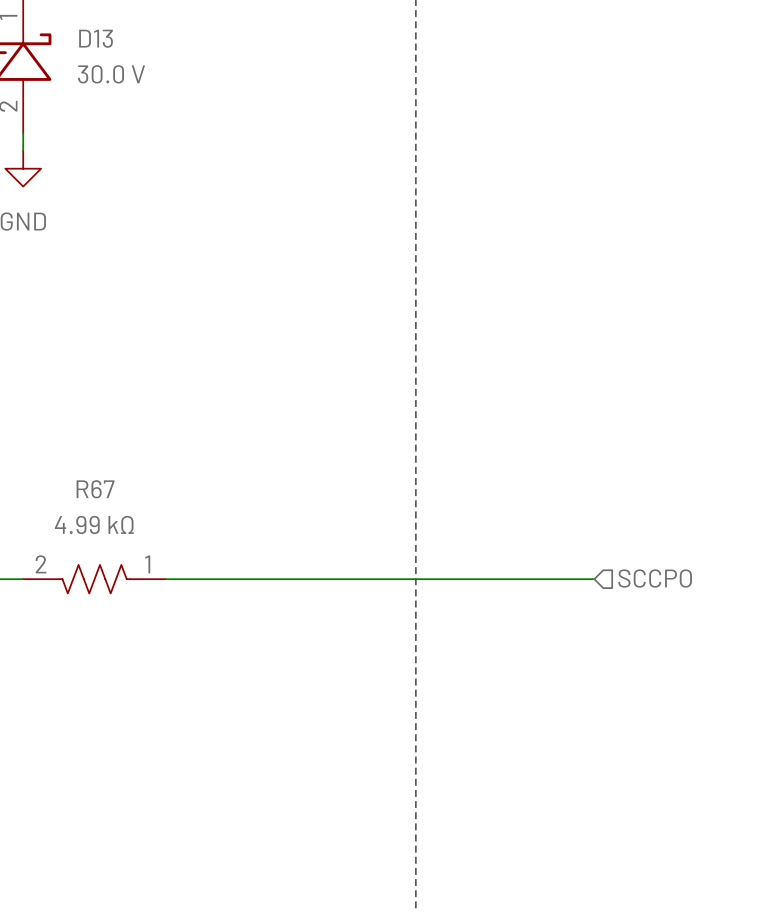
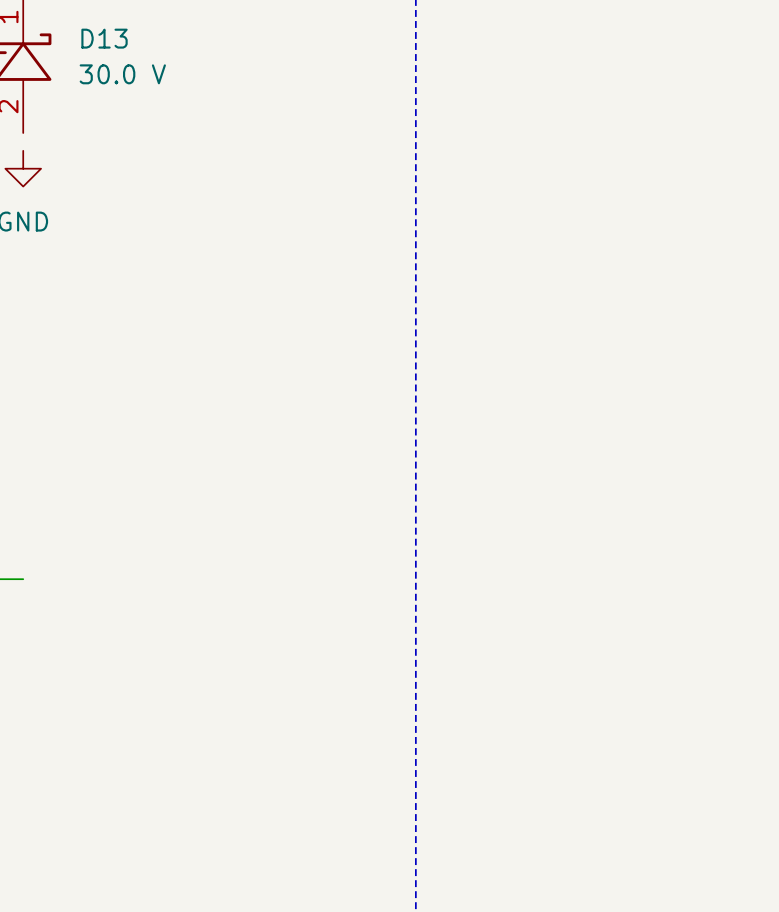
wire: (23, 133) (23, 150) -> none
hierarchical label: SCCPO (655, 578) -> none
R67: 4.99 kΩ (94, 579) -> none
wire: (166, 579) (594, 579) -> none

